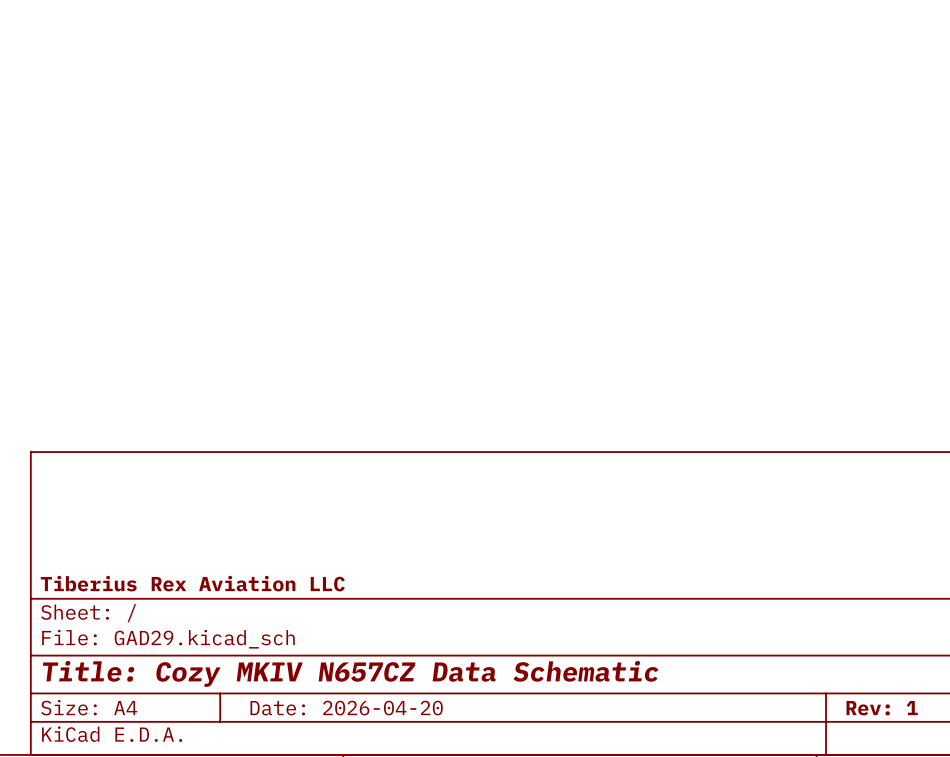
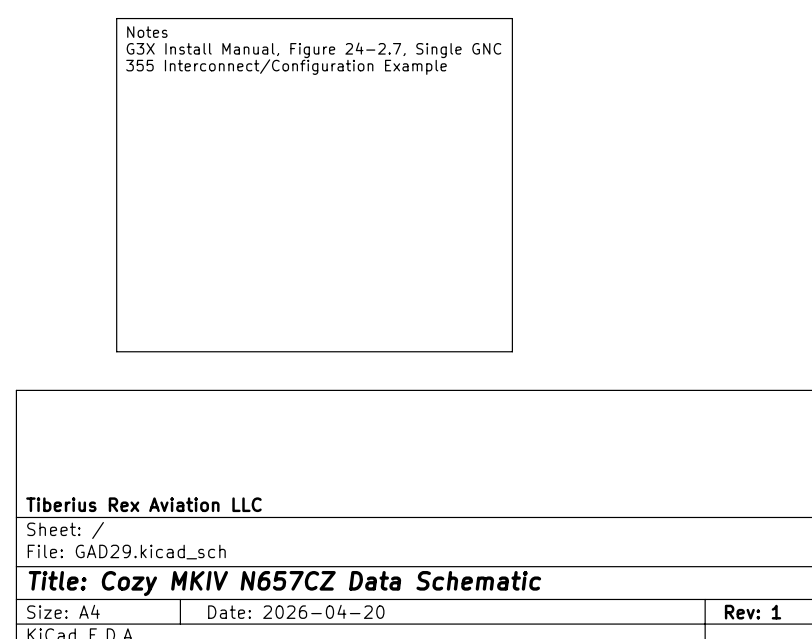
line: none -> (116, 18) (512, 18) (512, 351) (116, 351) (116, 18)
text: none -> Notes (147, 32)
text: none -> G3X Install Manual, Figure 24-2.7, Single GNC (313, 50)
text: none -> 355 Interconnect/Configuration Example (286, 67)

